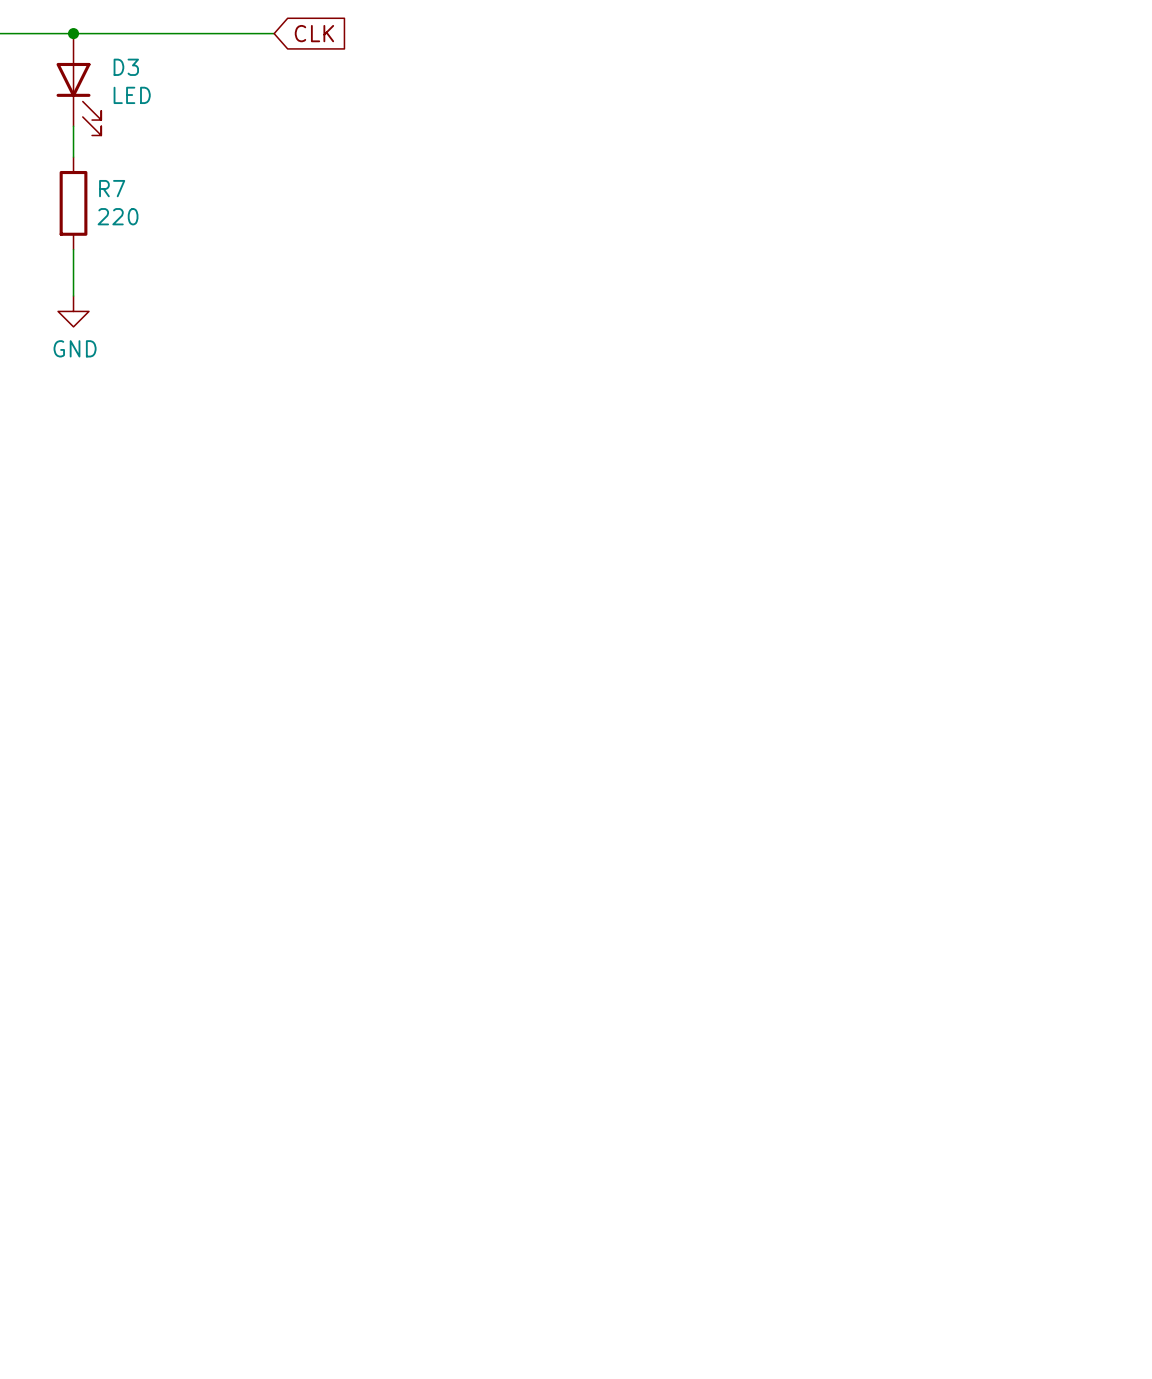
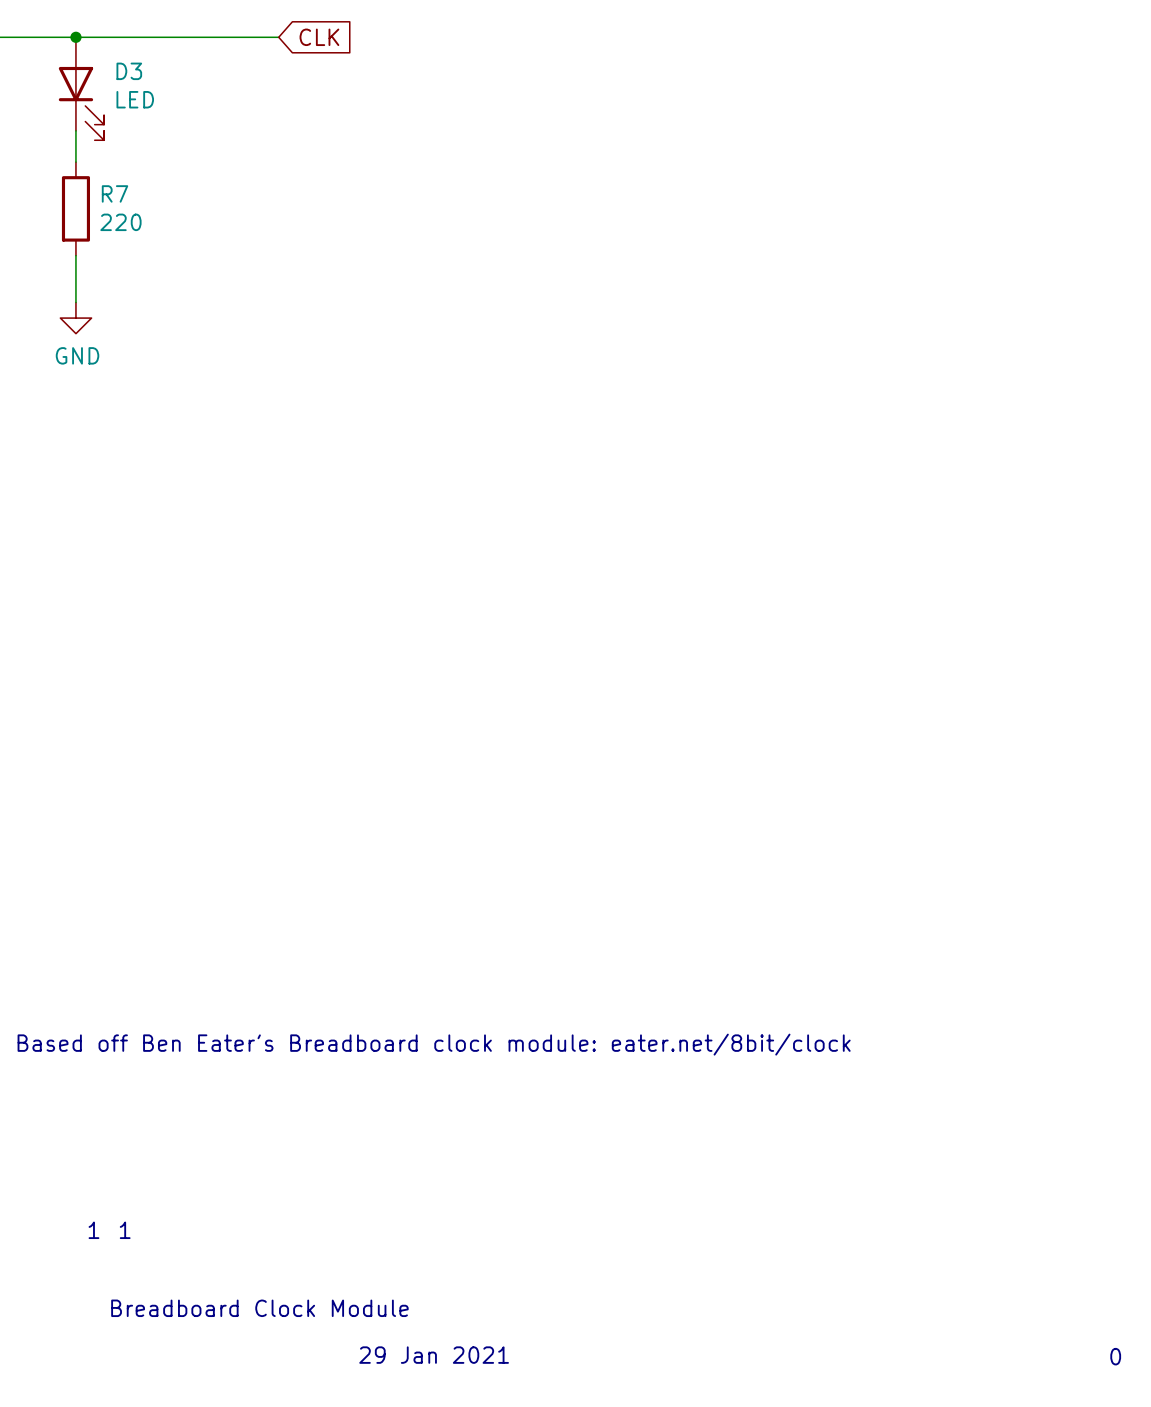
text: none -> Based off Ben Eater's Breadboard clock module: eater.net/8bit/clock (434, 1044)
text: none -> 1 (93, 1230)
text: none -> 1 (125, 1230)
text: none -> Breadboard Clock Module (259, 1308)
text: none -> 29 Jan 2021 (434, 1355)
text: none -> 0 (1115, 1356)

